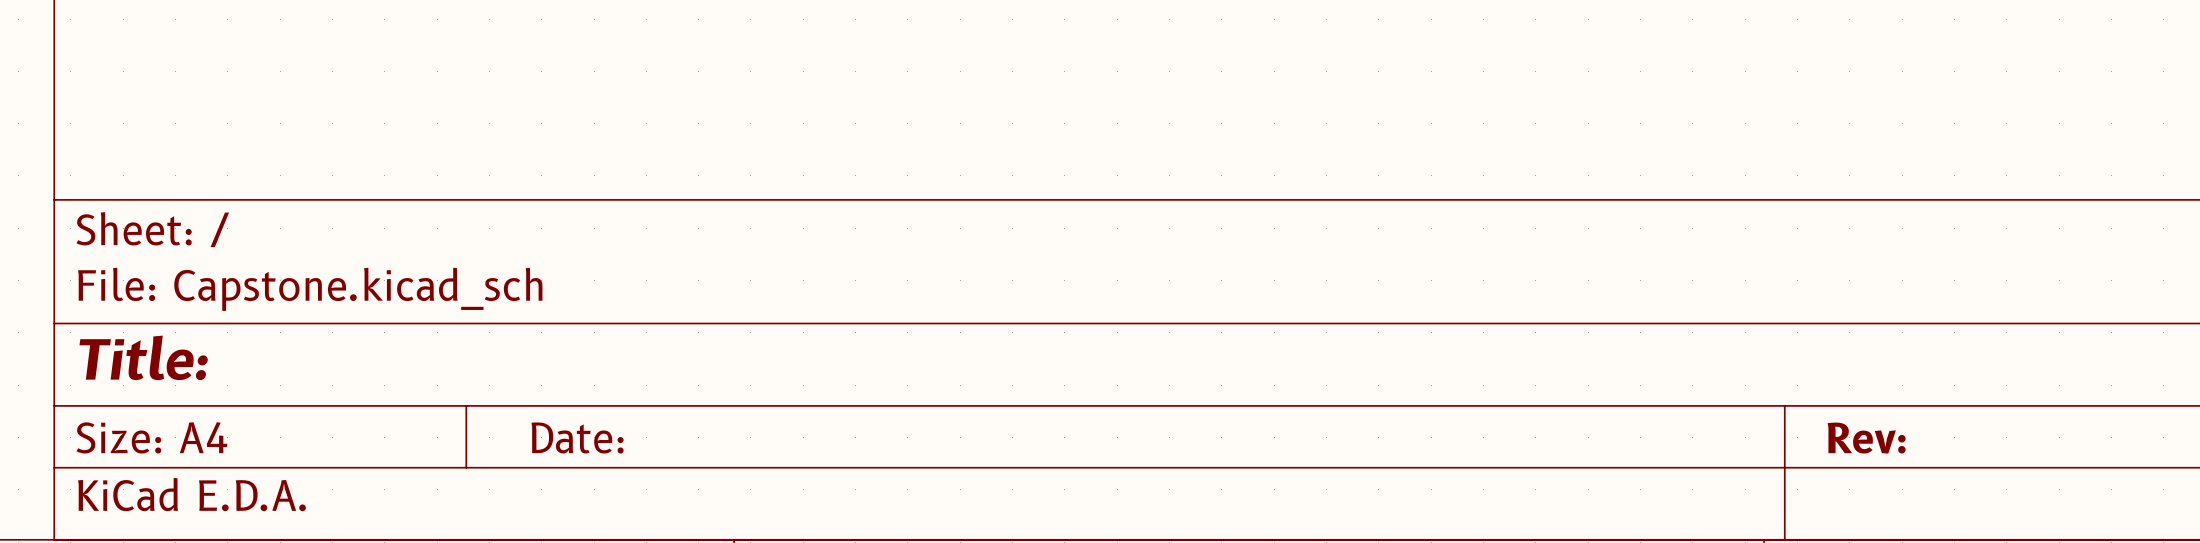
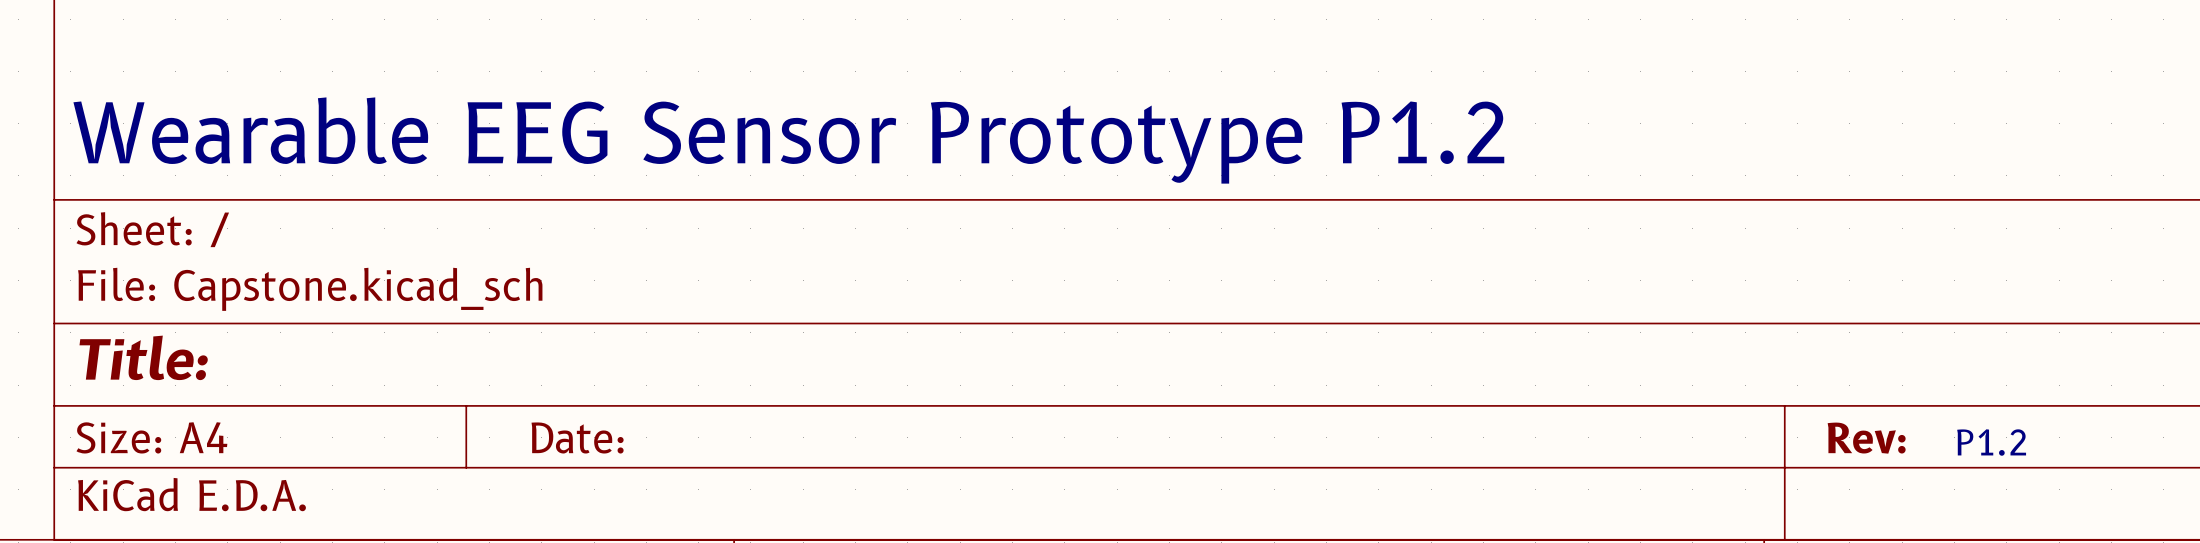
text: none -> Wearable EEG Sensor Prototype P1.2 (788, 140)
text: none -> P1.2 (1991, 442)

